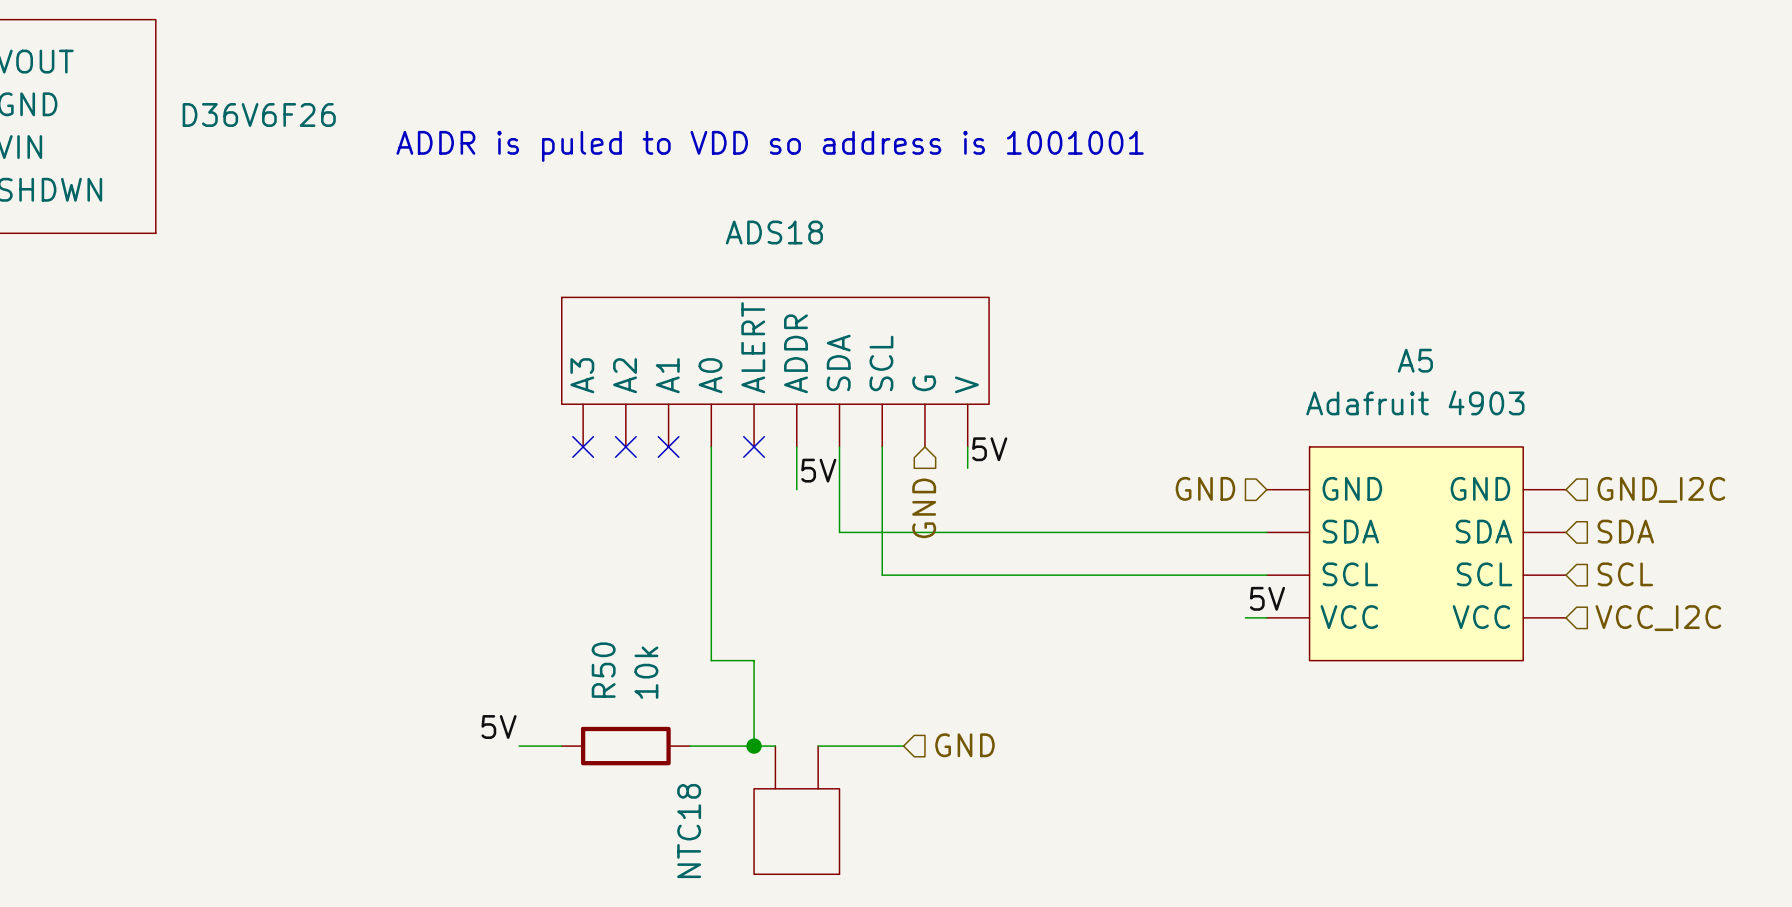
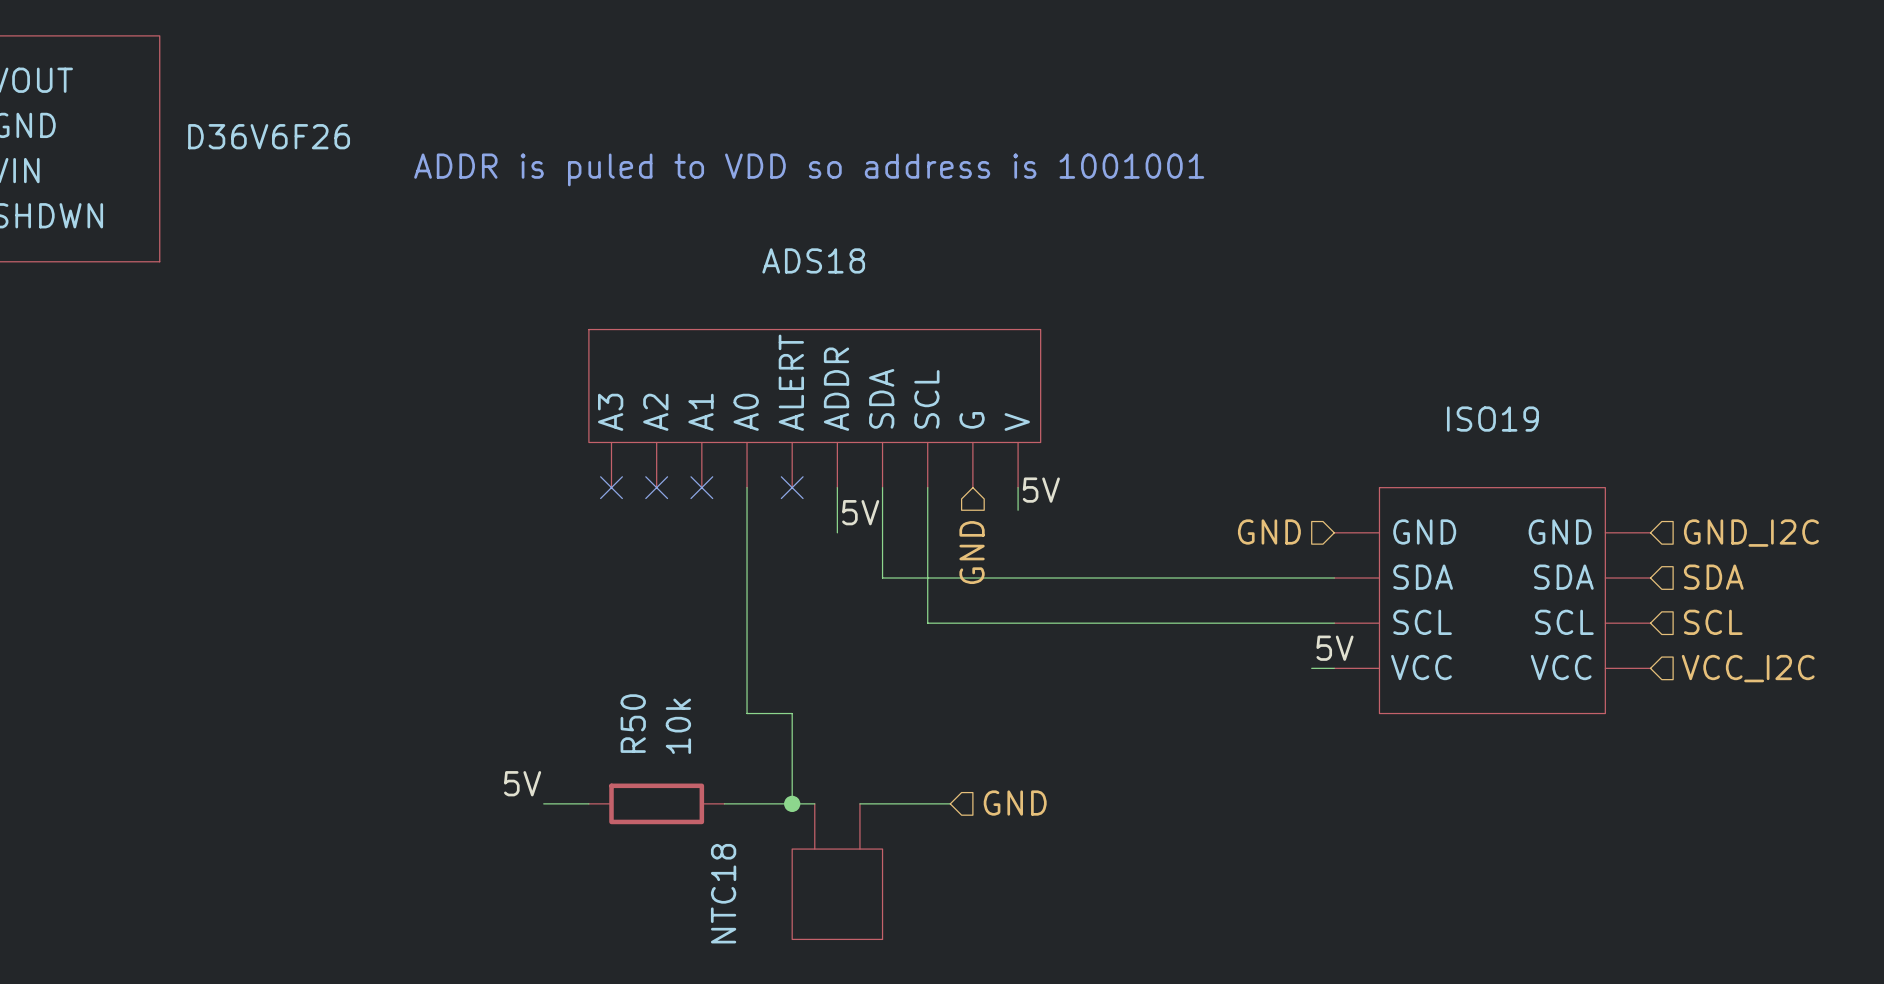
A5: Adafruit 4903 (1416, 553) -> none
ISO19: none -> (1492, 600)

